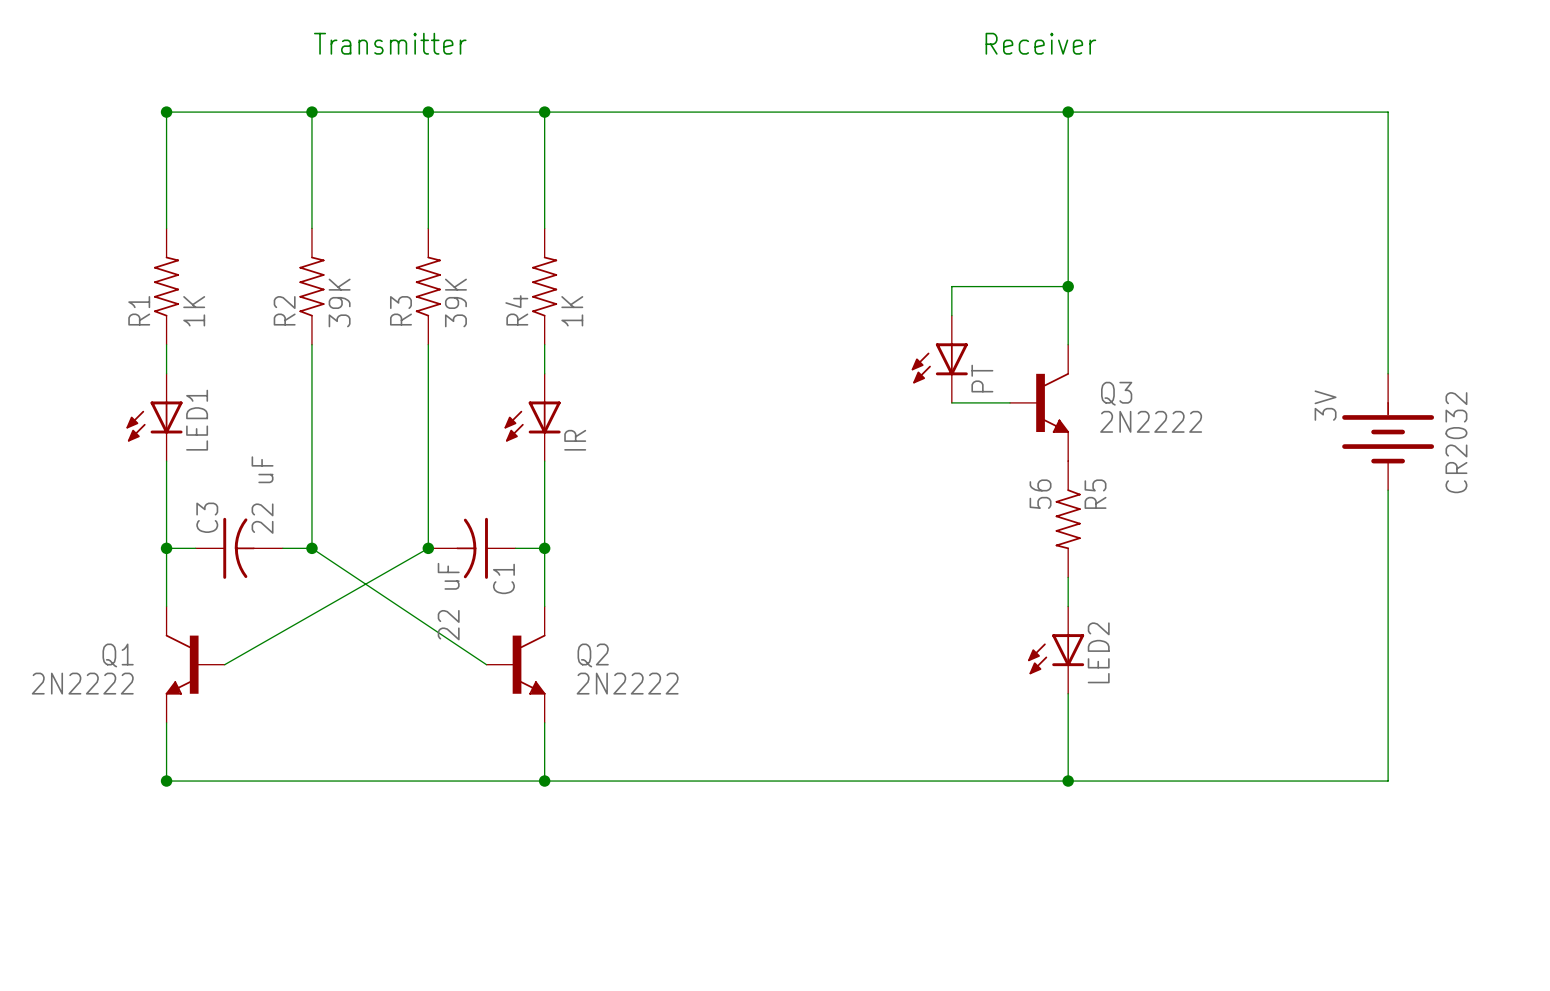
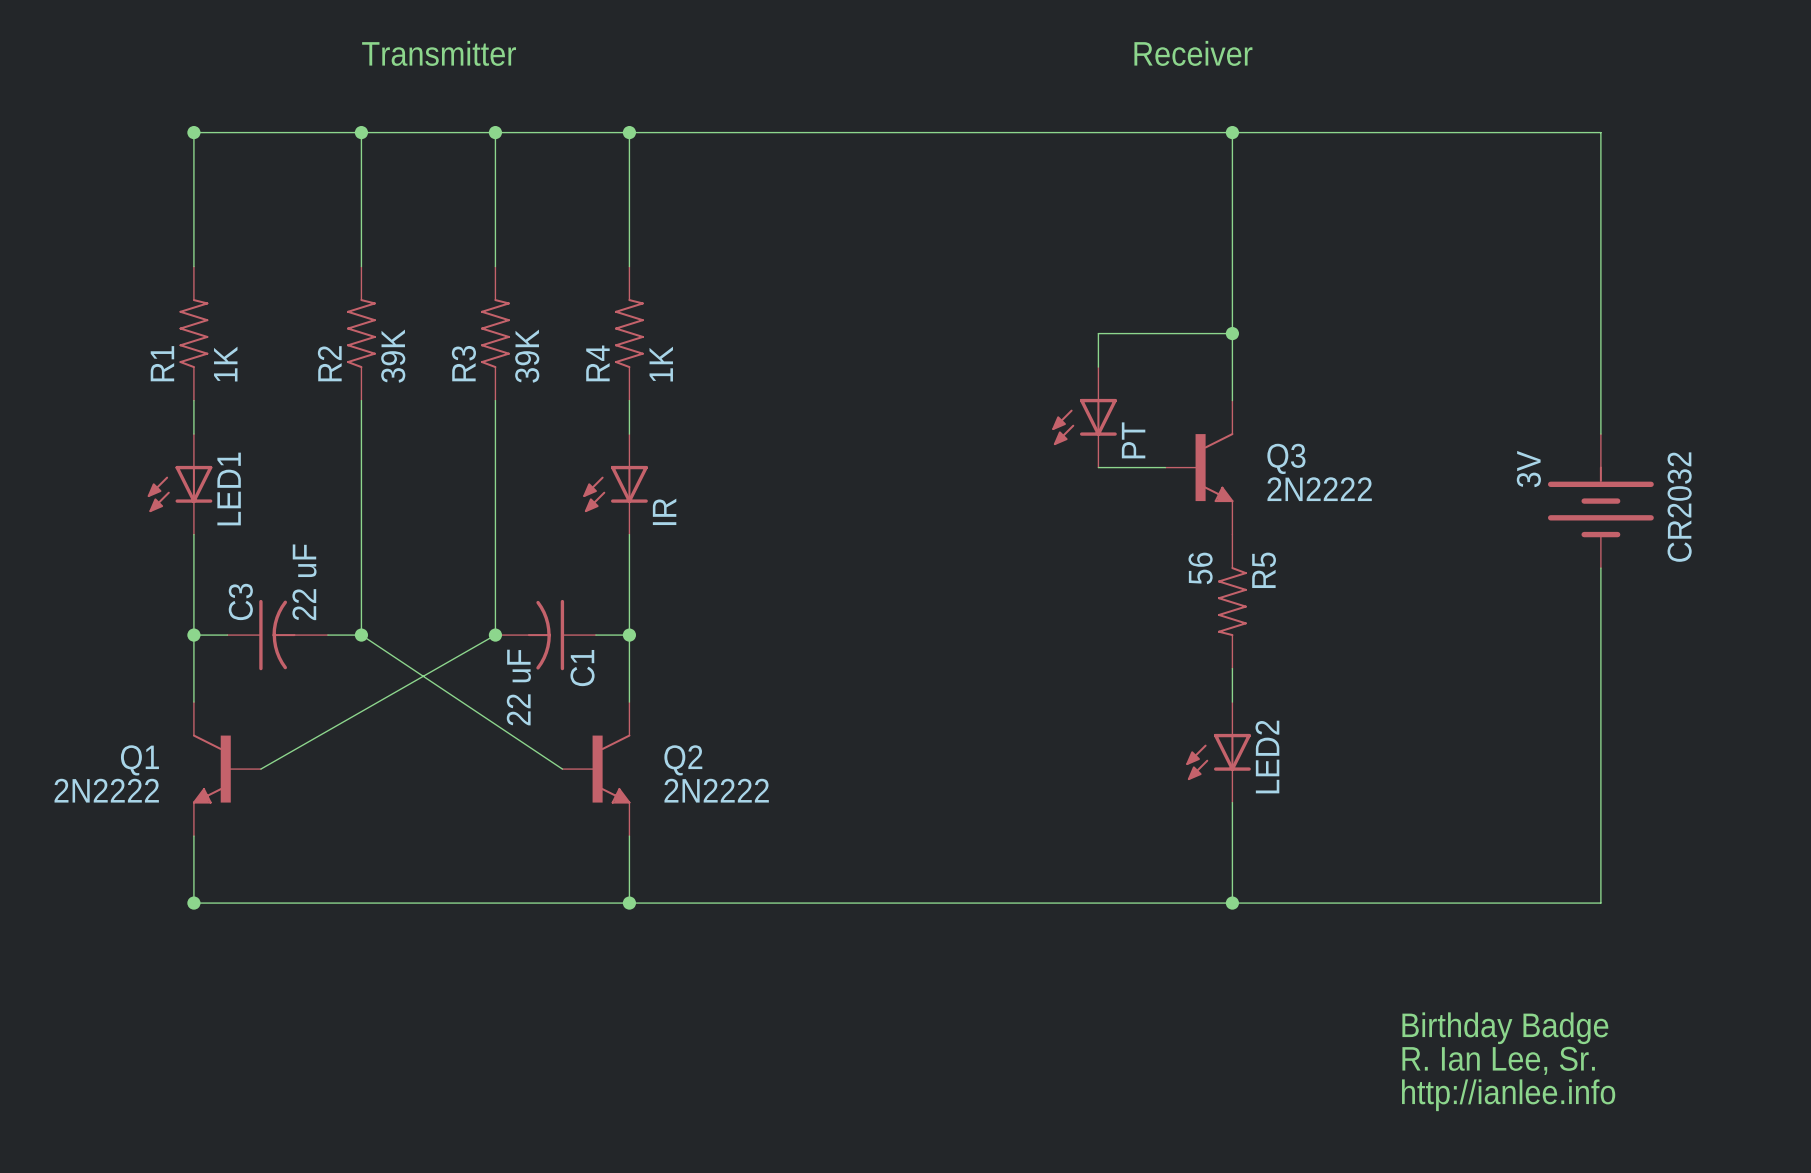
text: none -> Birthday Badge (1505, 1028)
text: none -> R. Ian Lee, Sr. (1498, 1060)
text: none -> http://ianlee.info (1508, 1095)

